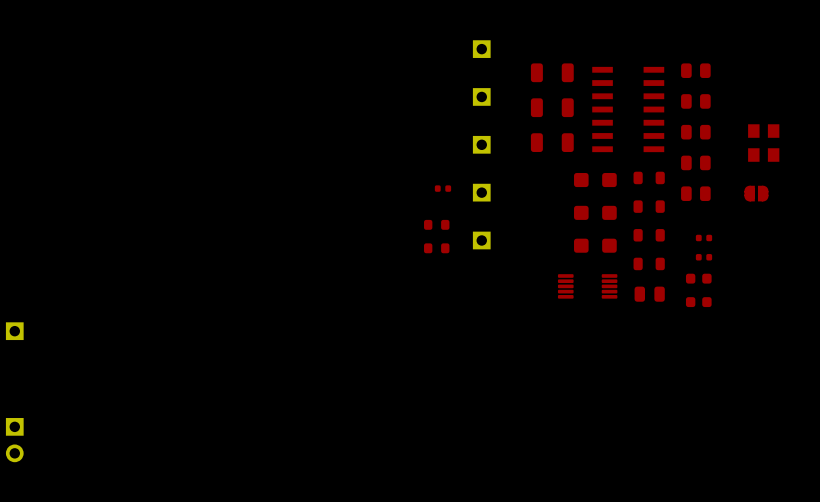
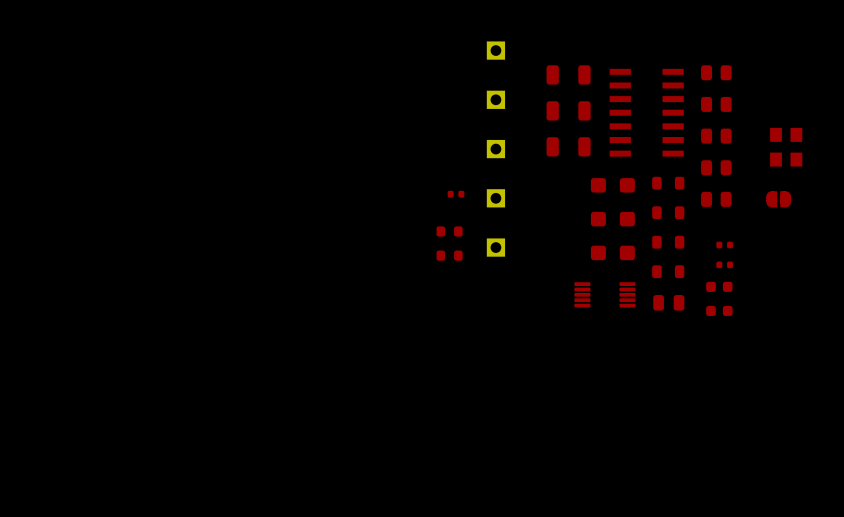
part: (14, 331) -> none
part: (14, 440) -> none

